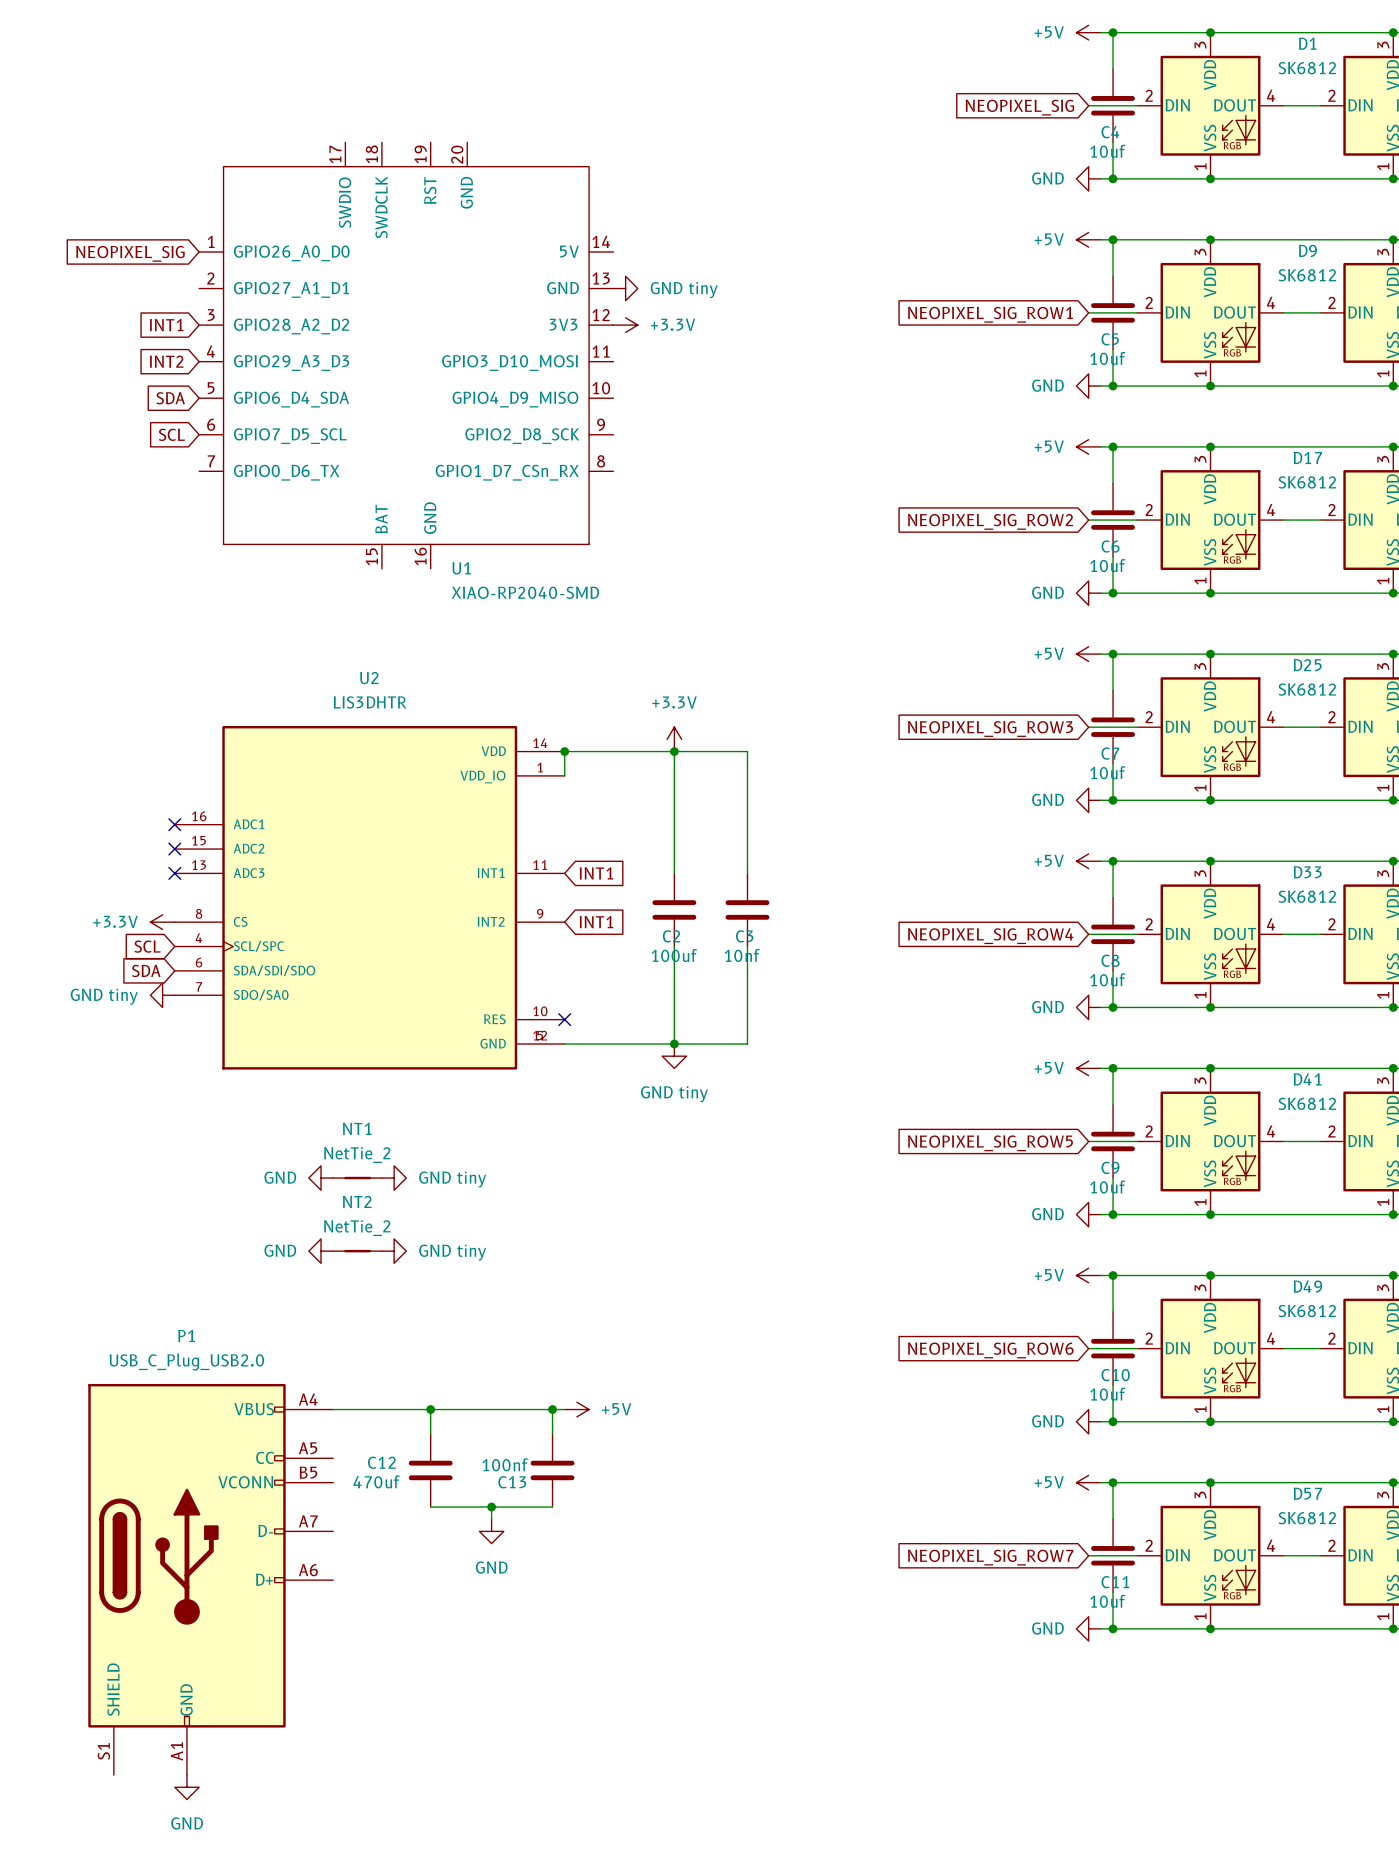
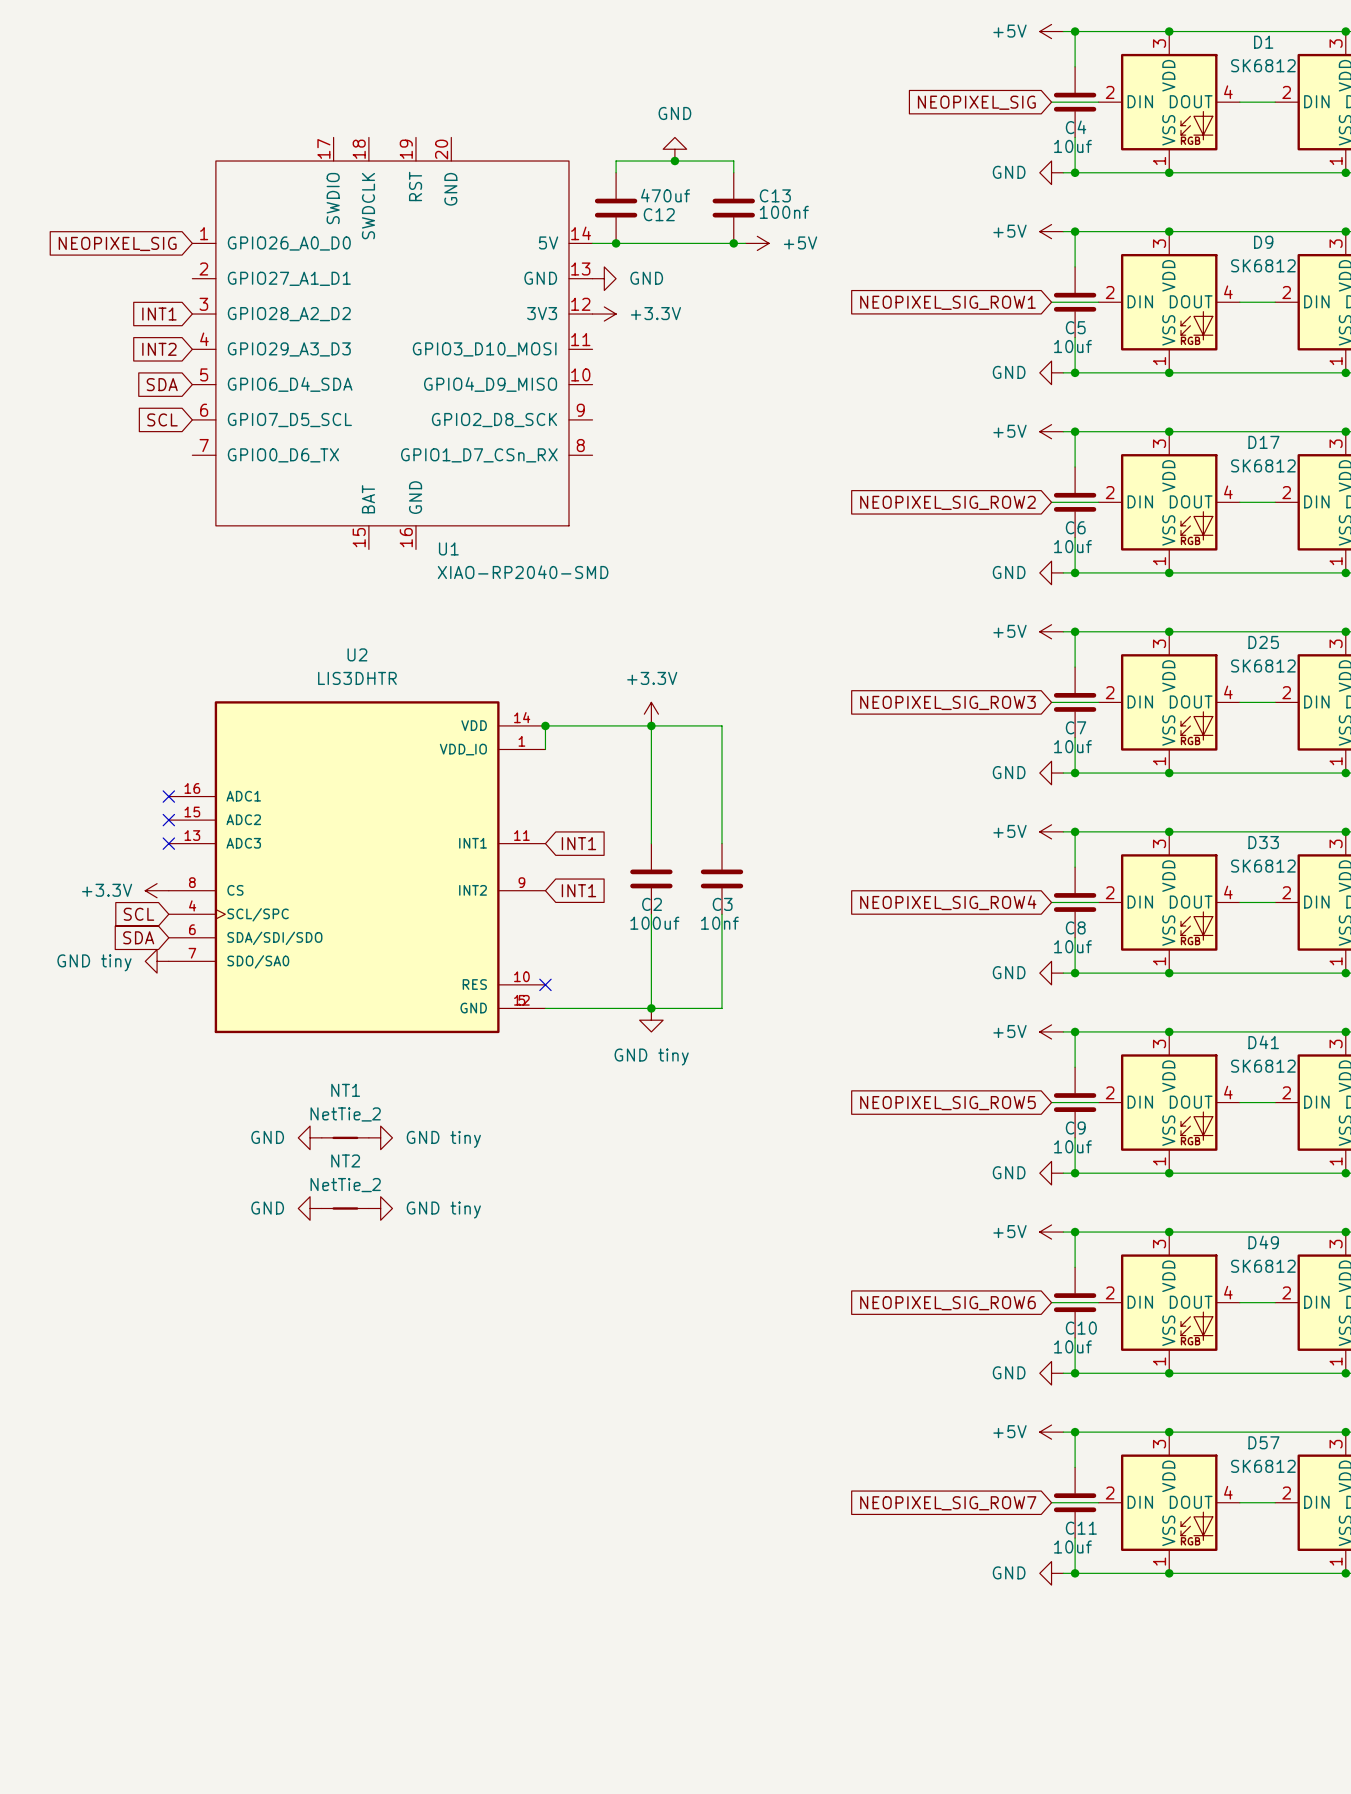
power symbol: none -> GND (674, 149)
junction: none -> (674, 161)
wire: none -> (616, 172) (616, 161) (733, 161) (733, 172)
wire: none -> (592, 243) (745, 243)
junction: none -> (616, 243)
junction: none -> (733, 243)
power symbol: none -> +5V (757, 243)
power symbol: GND tiny (625, 288) -> GND (604, 278)
wire: (333, 1409) (564, 1409) -> none
wire: (430, 1409) (430, 1433) -> none
junction: (430, 1409) -> none
wire: (552, 1409) (552, 1433) -> none
junction: (552, 1409) -> none
power symbol: +5V (576, 1409) -> none
C12 name position: C12 (381, 1462) -> C12 (659, 214)
C13 value position: 100nf (505, 1464) -> 100nf (784, 212)
C12 position: (430, 1470) -> (616, 208)
C13 position: (552, 1470) -> (733, 208)
C12 value position: 470uf (376, 1481) -> 470uf (665, 195)
C13 name position: C13 (512, 1482) -> C13 (775, 195)
wire: (430, 1507) (552, 1507) -> none
wire: (491, 1507) (491, 1519) -> none
junction: (491, 1507) -> none
power symbol: GND (491, 1531) -> none
P1: USB_C_Plug_USB2.0 (210, 1579) -> none
power symbol: GND (186, 1787) -> none

